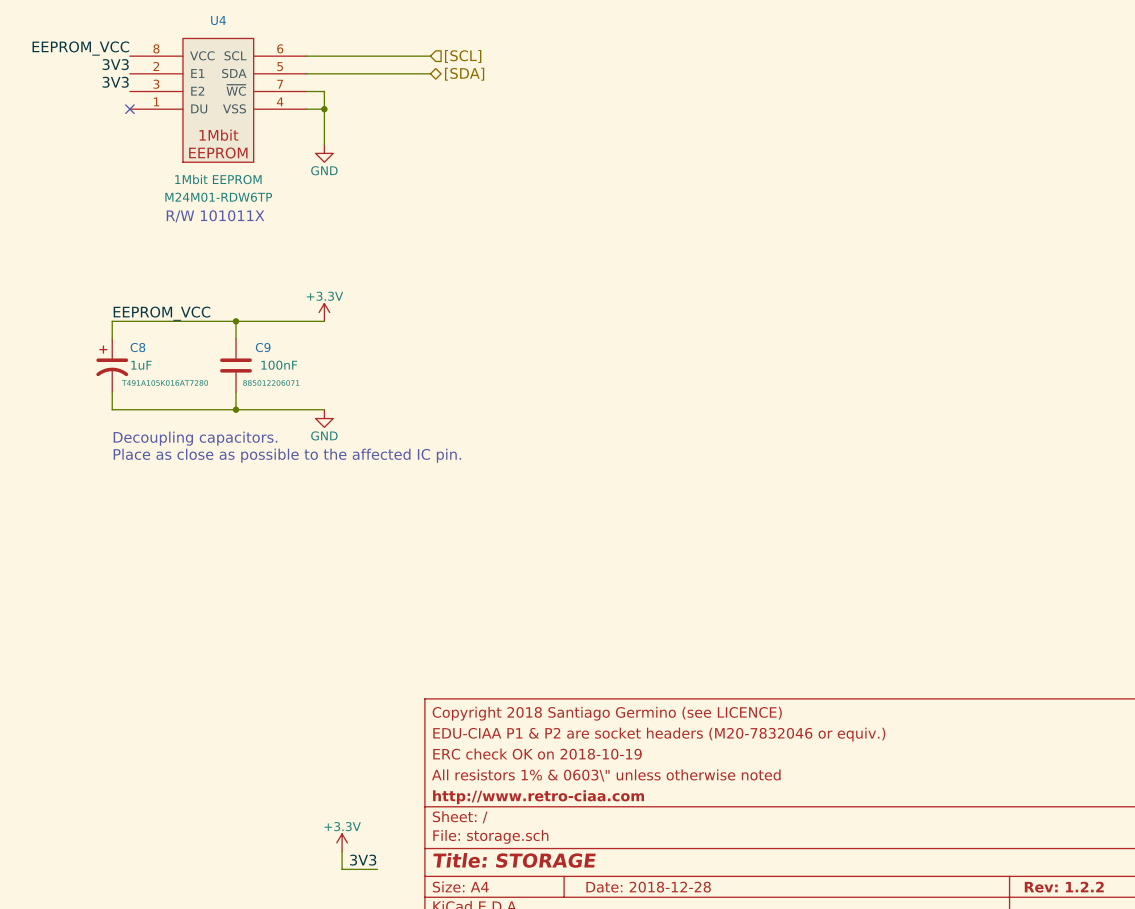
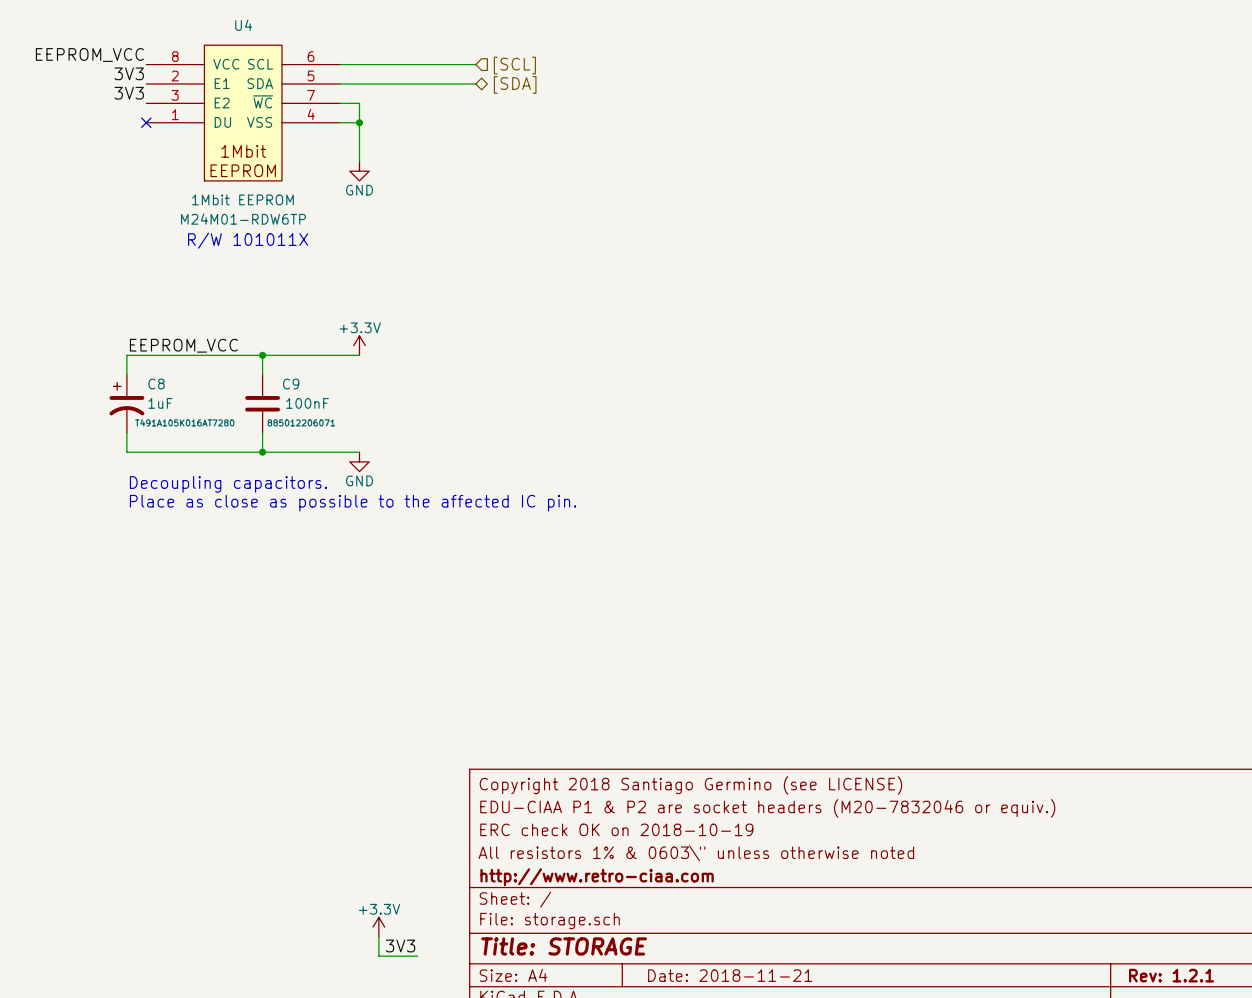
title block: Copyright 2018 Santiago Germino (see LICENCE) (607, 713) -> Copyright 2018 Santiago Germino (see LICENSE) (690, 785)
title block: Date: 2018-12-28 (648, 887) -> Date: 2018-11-21 (730, 975)
title block: Rev: 1.2.2 (1064, 887) -> Rev: 1.2.1 (1171, 975)

